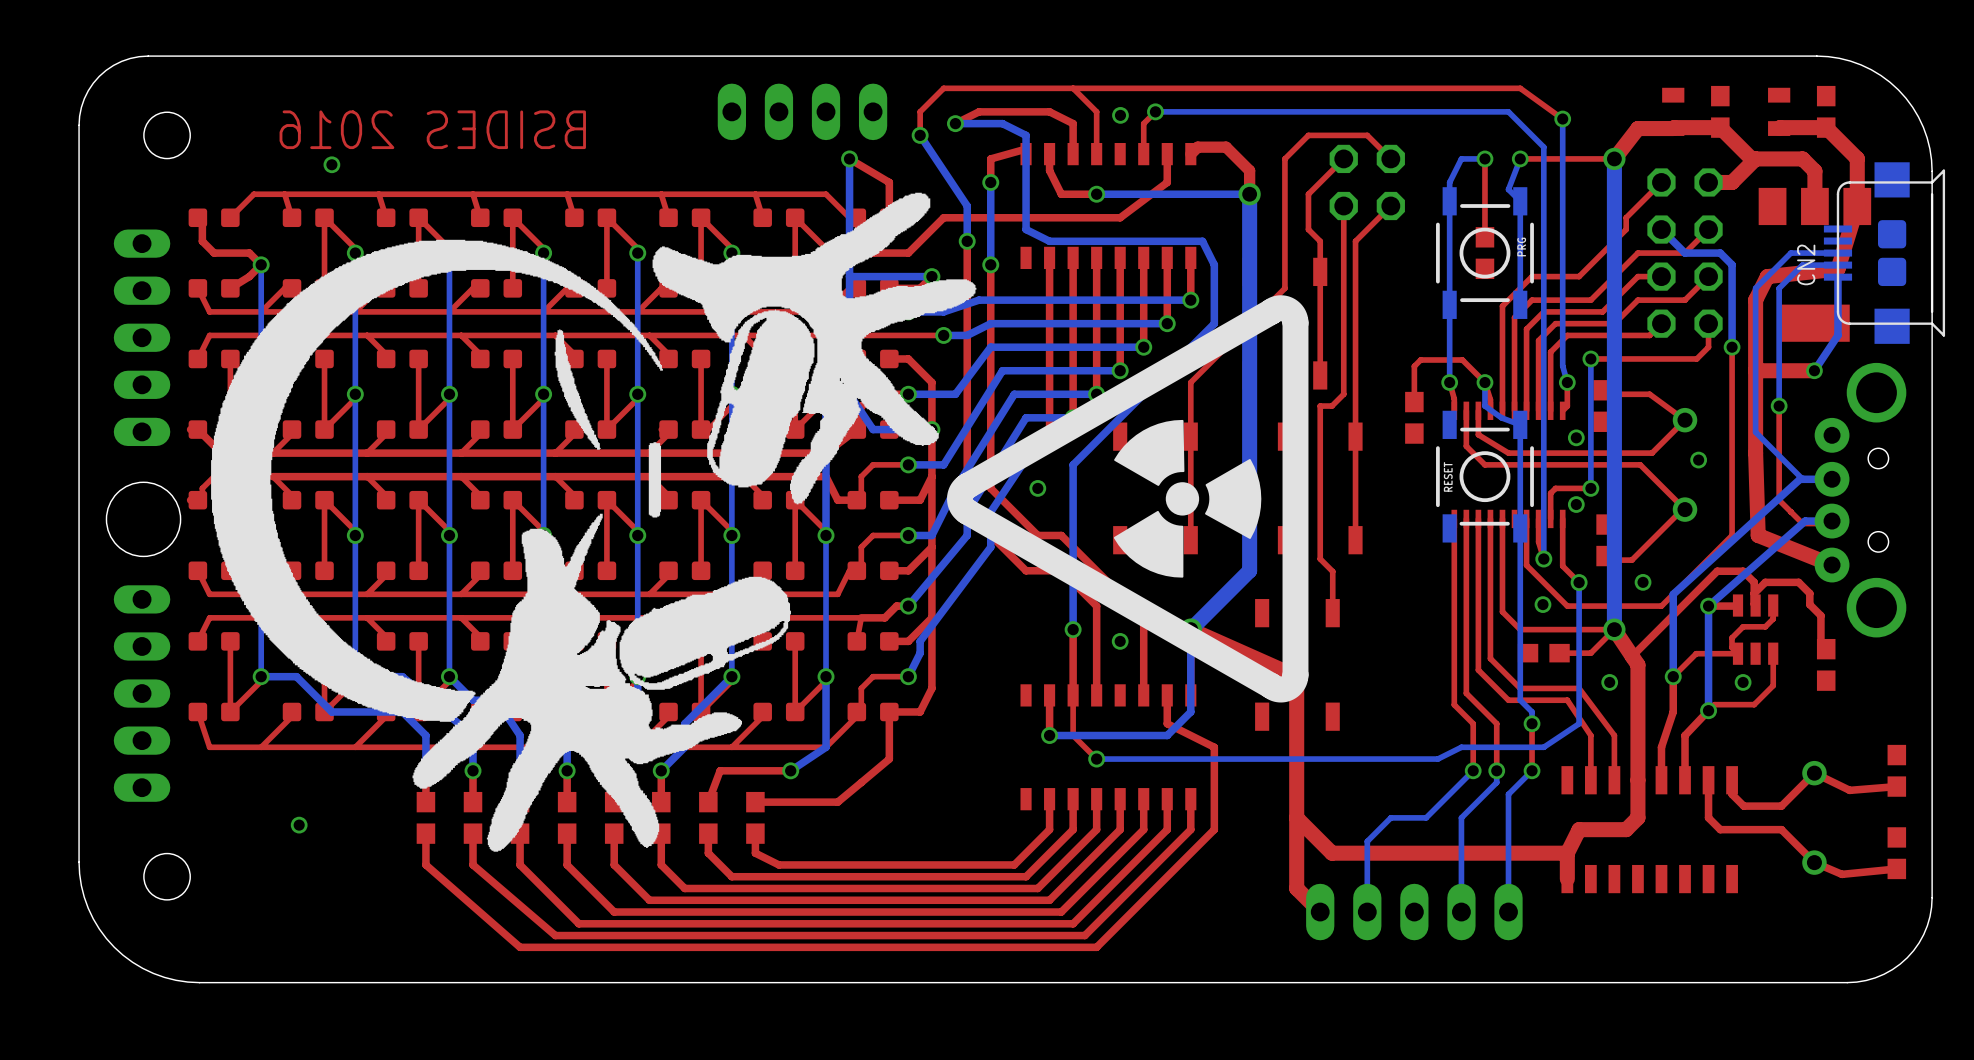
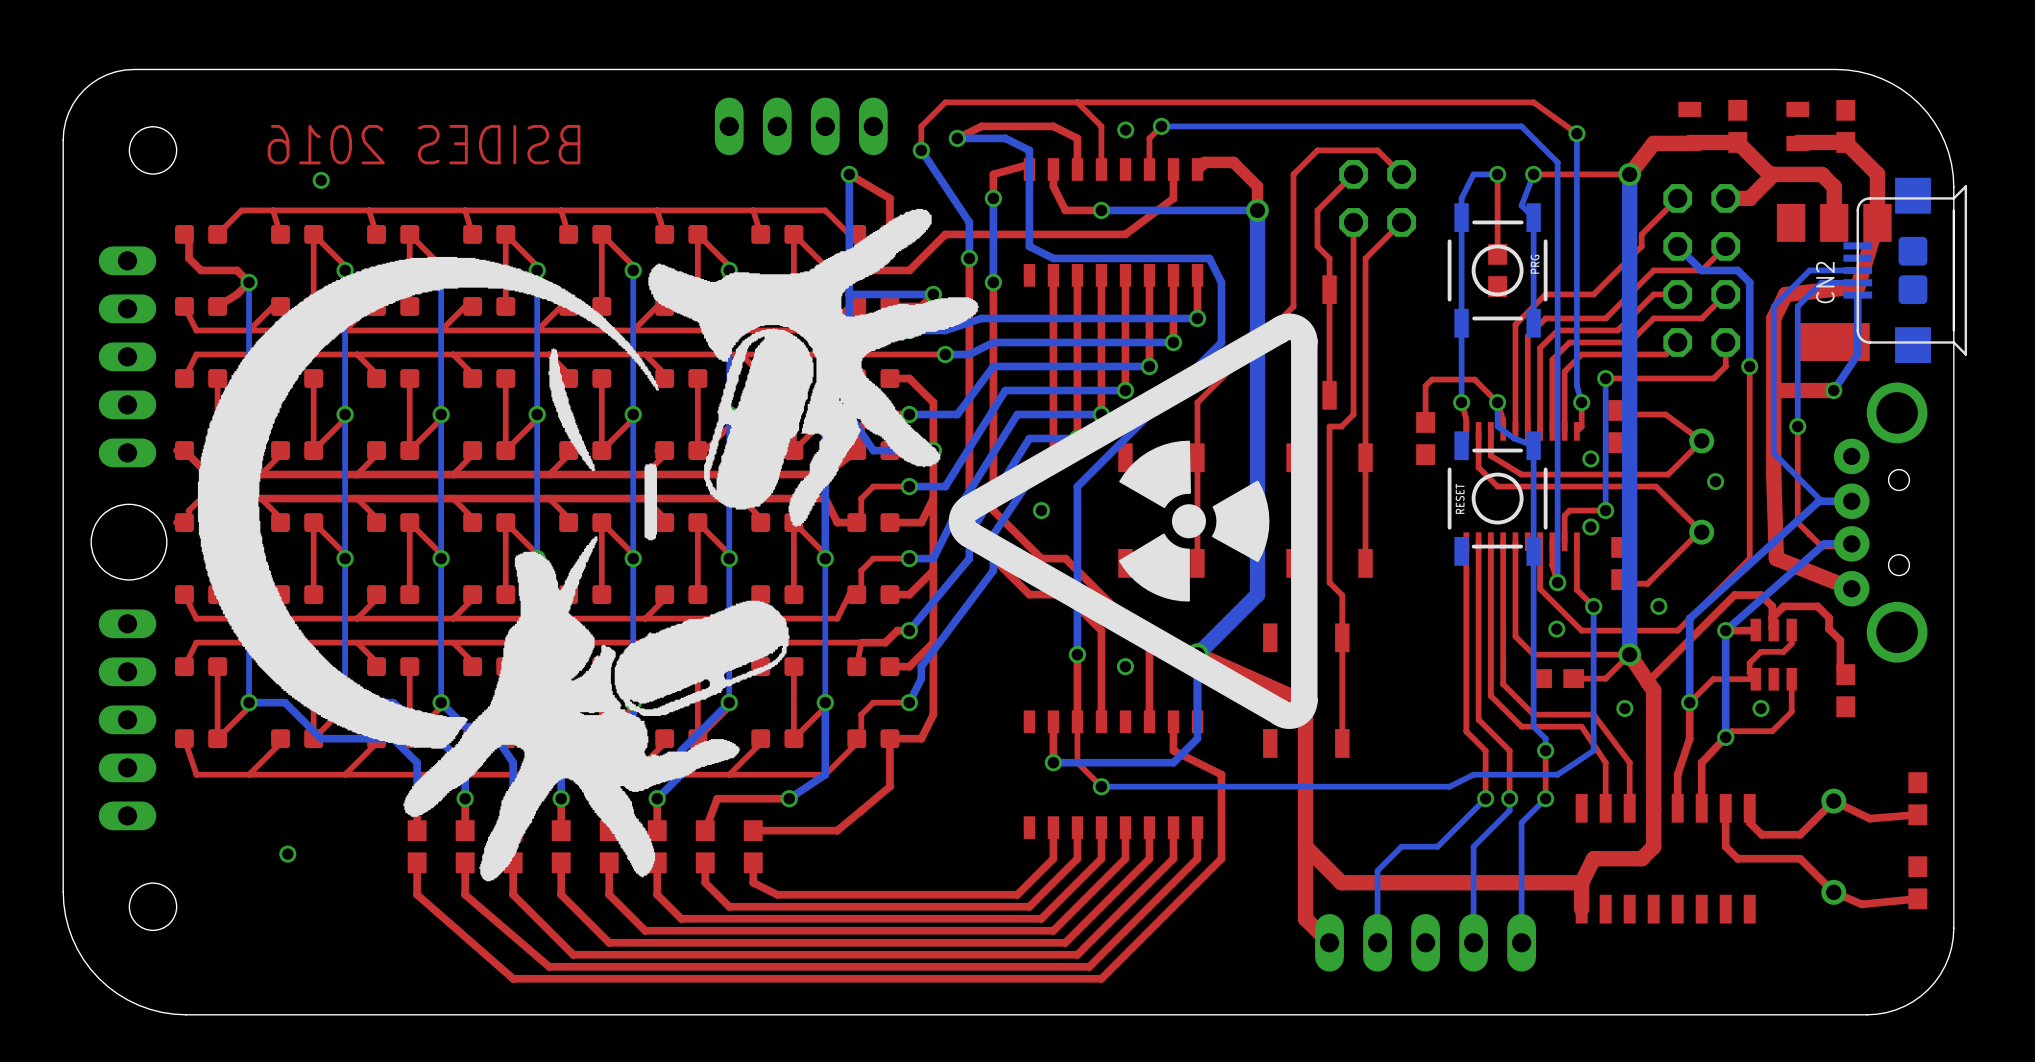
top track: none -> (1342, 637) (1342, 743)

